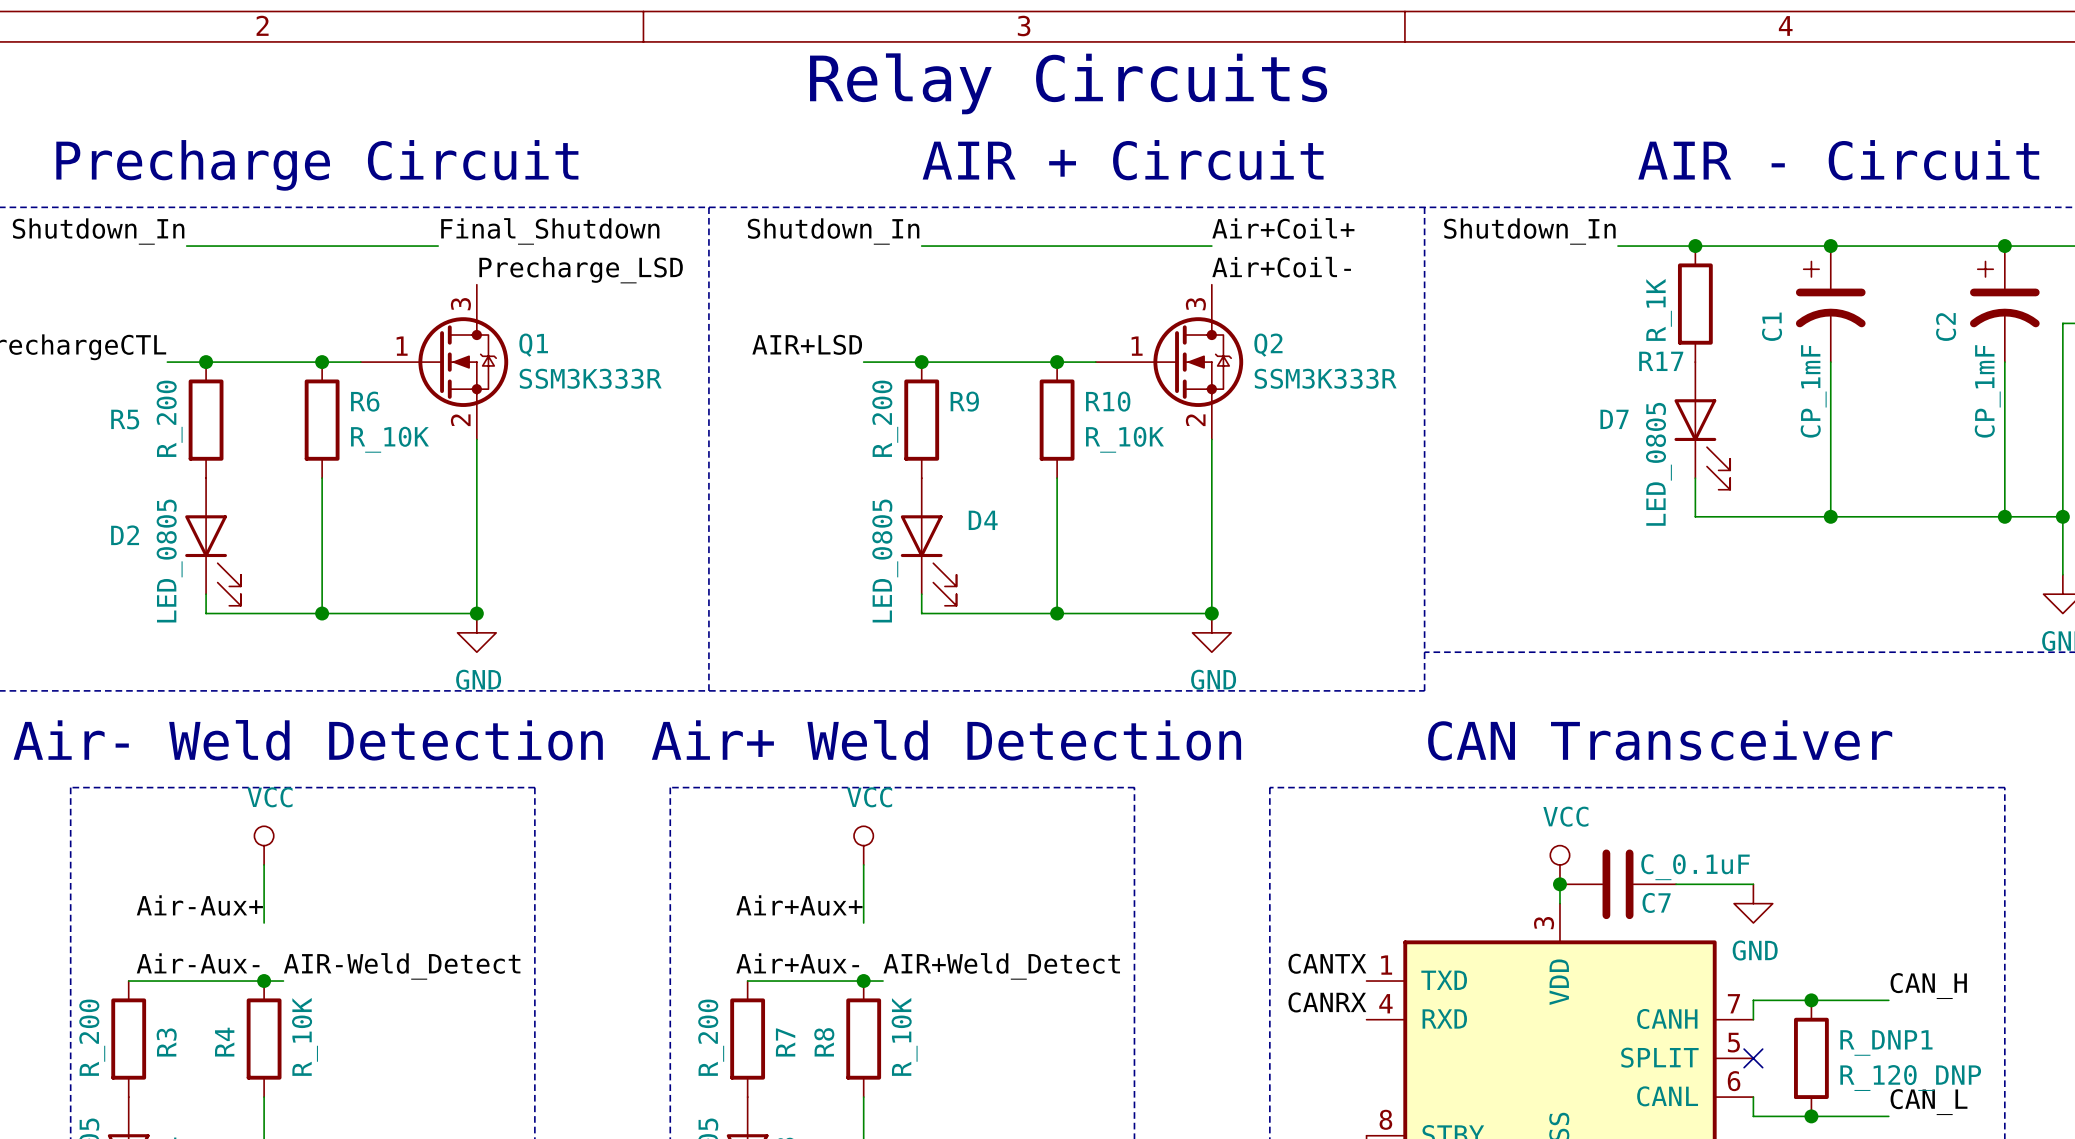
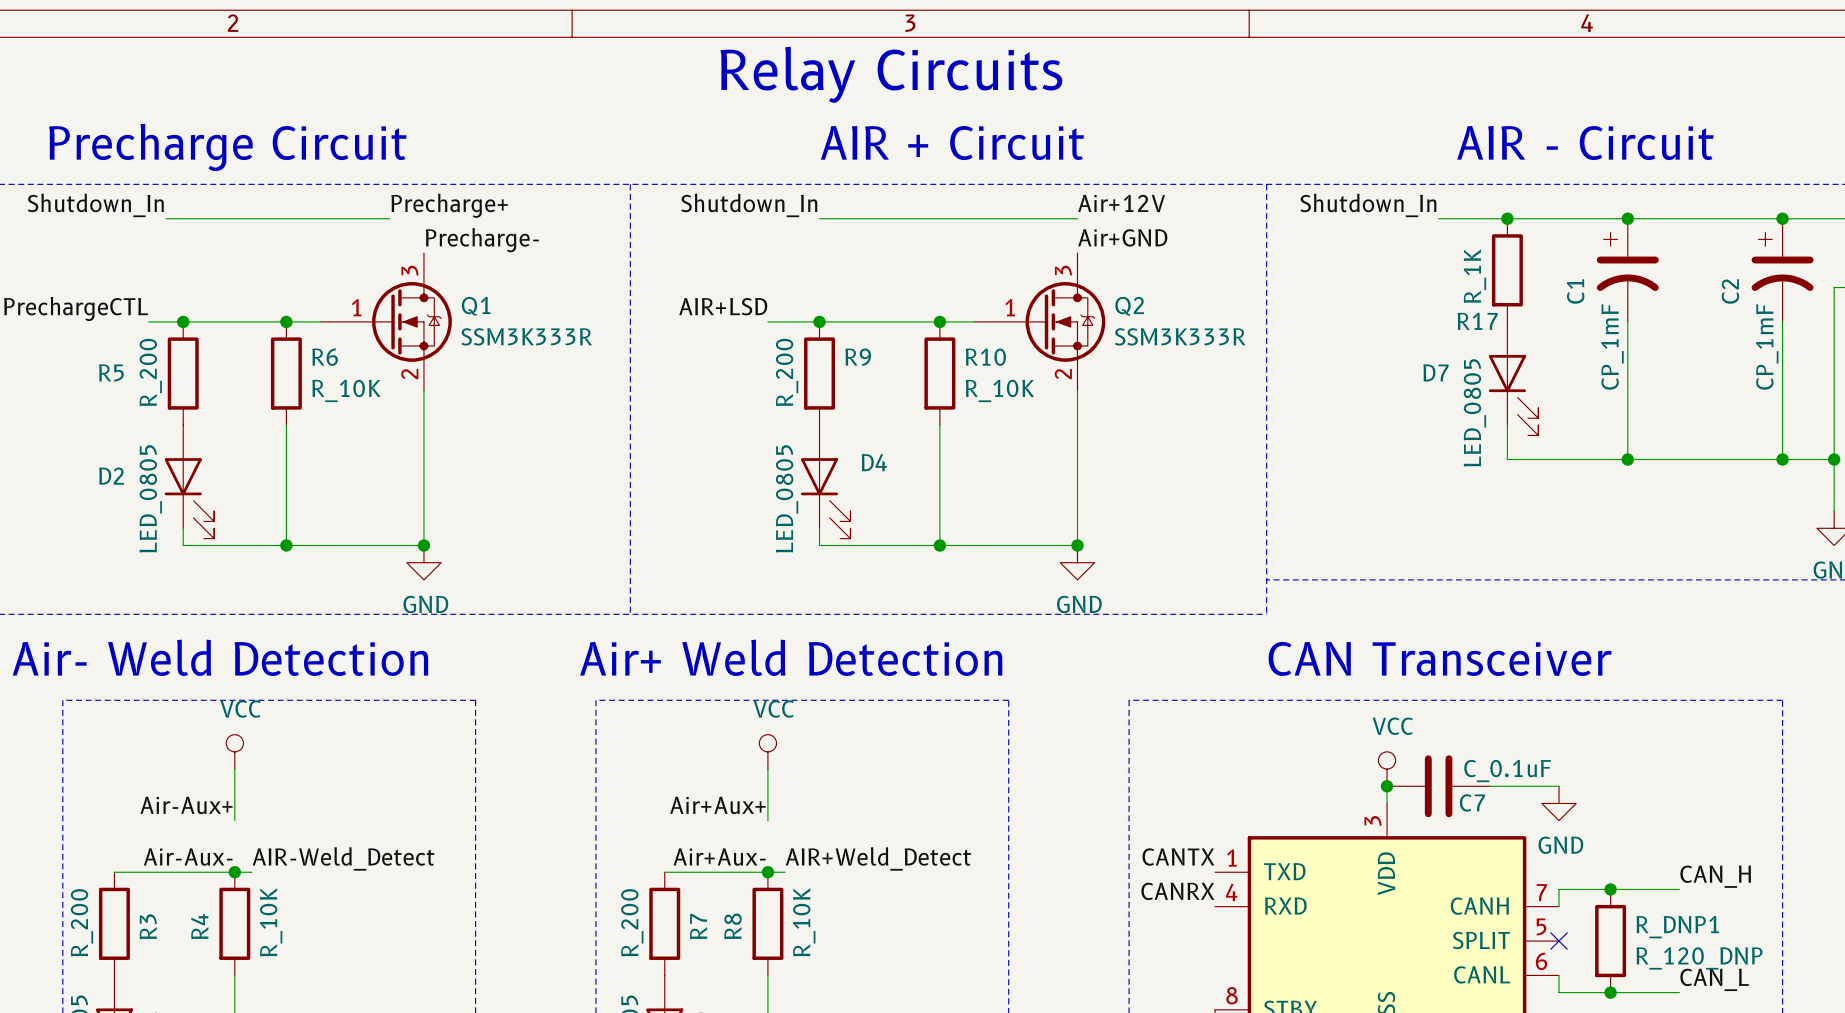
label: Air+Coil+ (1283, 228) -> Air+12V (1121, 203)
label: Final_Shutdown (550, 231) -> Precharge+ (449, 205)
label: Air+Coil- (1281, 267) -> Air+GND (1122, 237)
label: Precharge_LSD (581, 270) -> Precharge- (482, 240)

